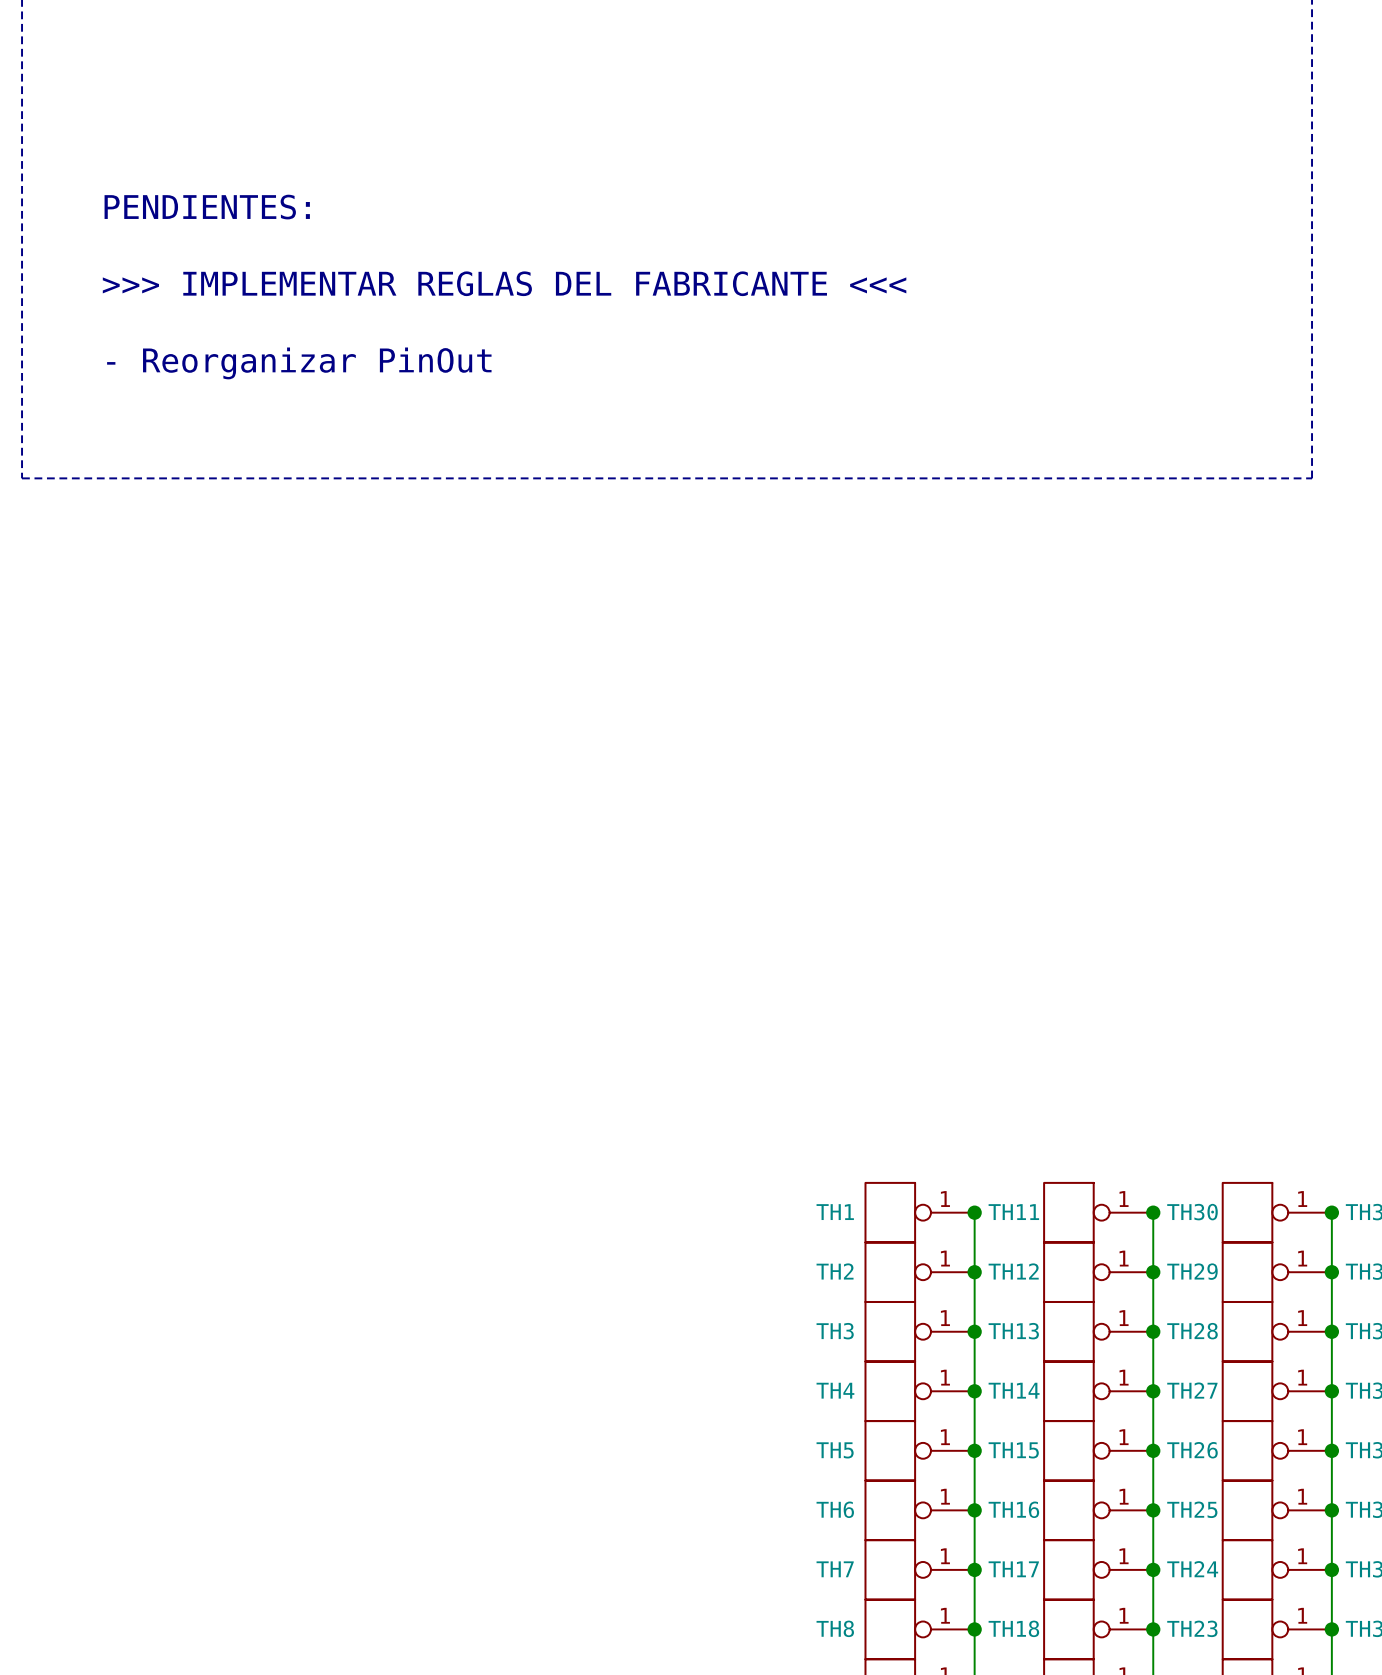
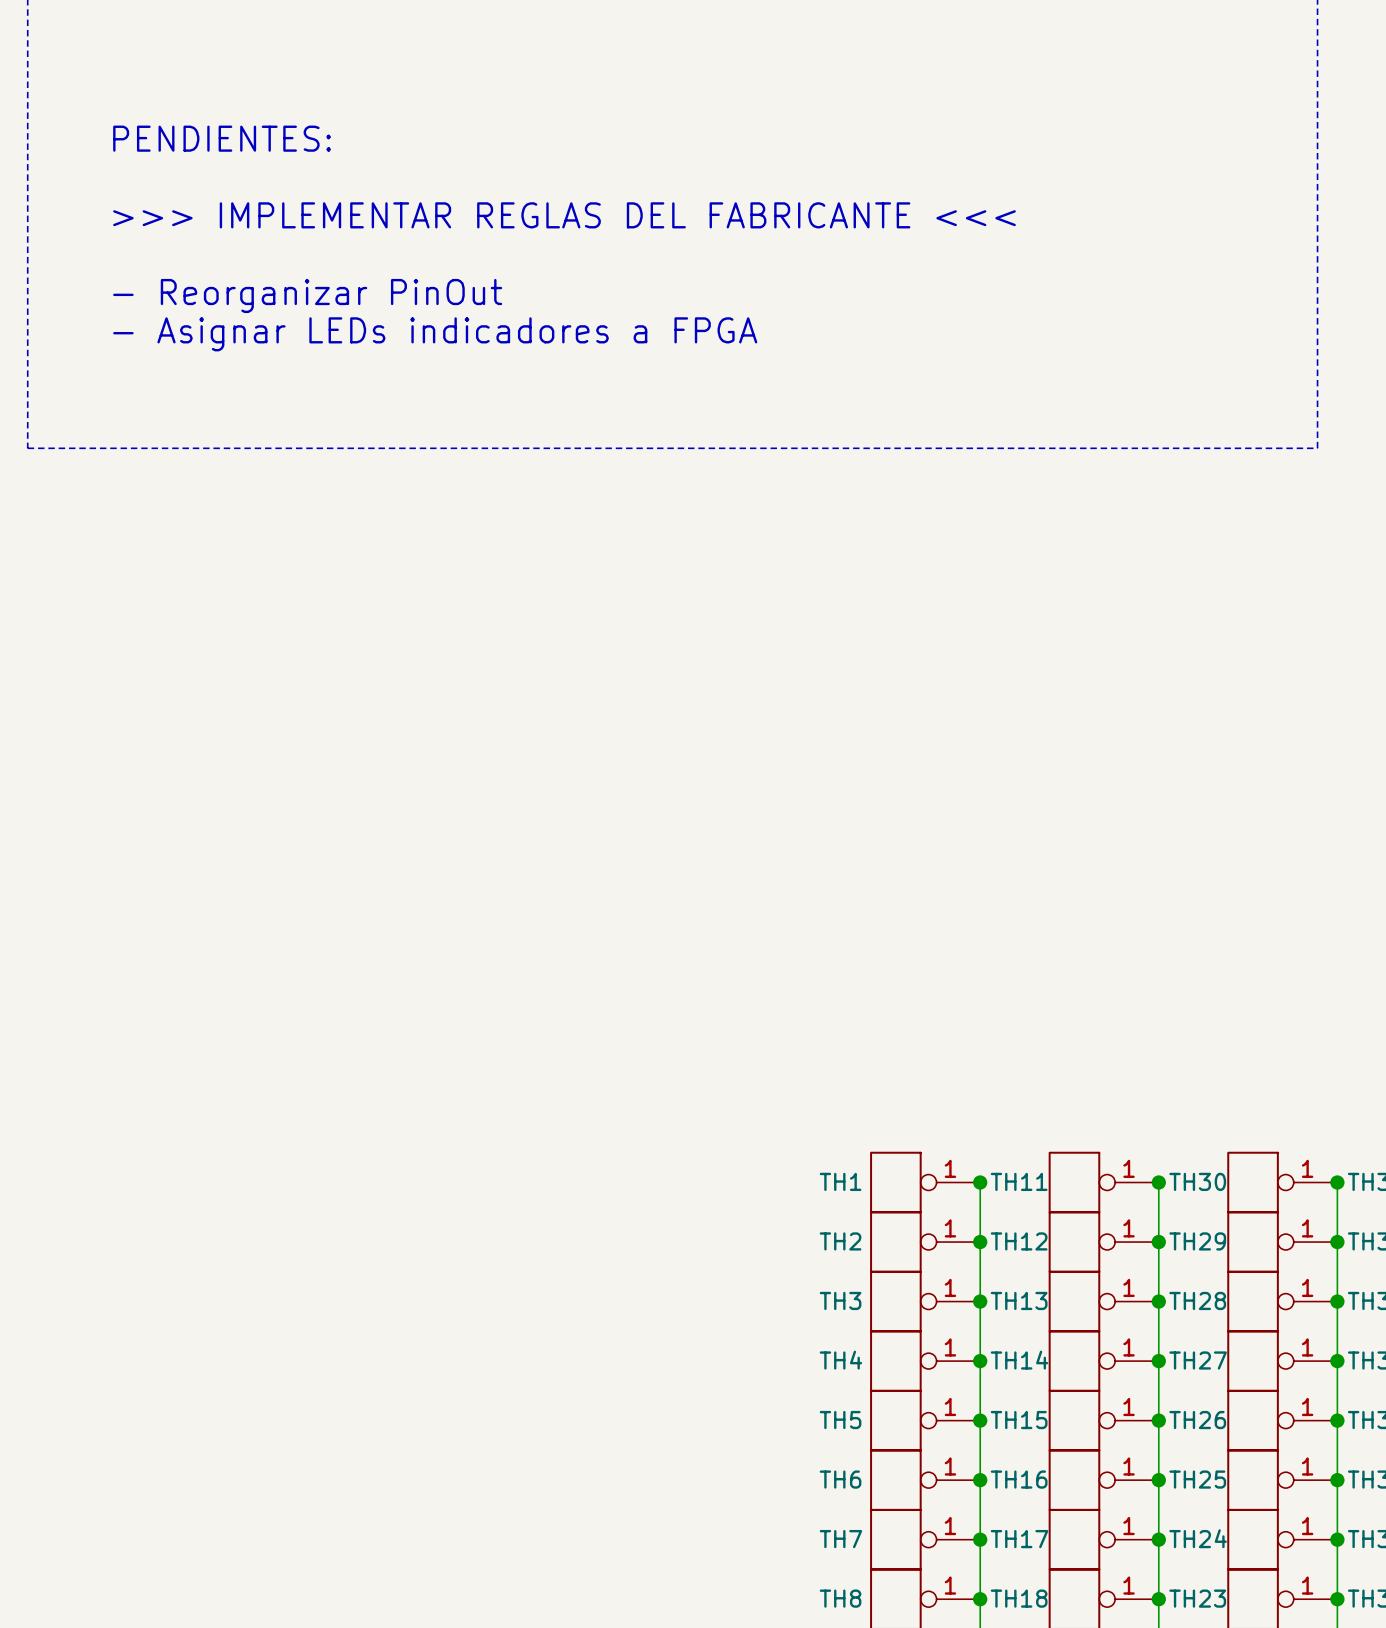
text position: PENDIENTES: (207, 207) -> PENDIENTES: (222, 138)
text position: >>> IMPLEMENTAR REGLAS DEL FABRICANTE <<< (504, 283) -> >>> IMPLEMENTAR REGLAS DEL FABRICANTE <<< (564, 215)
text: none -> - Reorganizar PinOut (307, 295)
text: - Reorganizar PinOut (299, 363) -> - Asignar LEDs indicadores a FPGA (435, 334)

